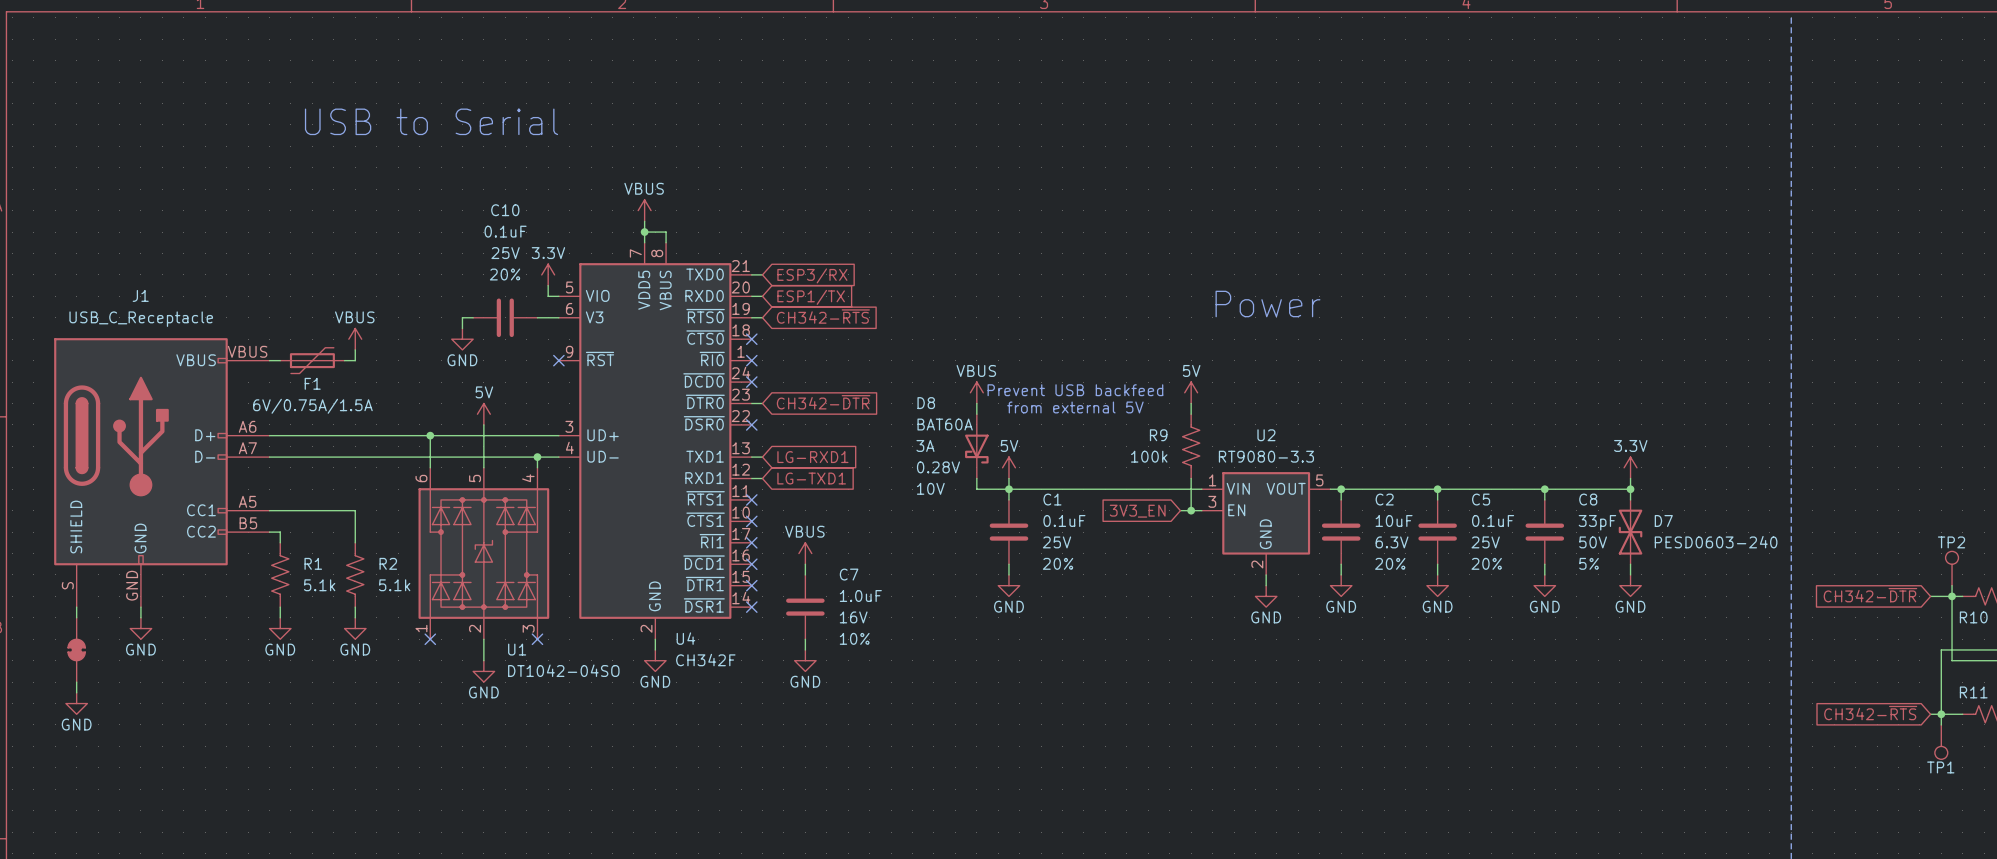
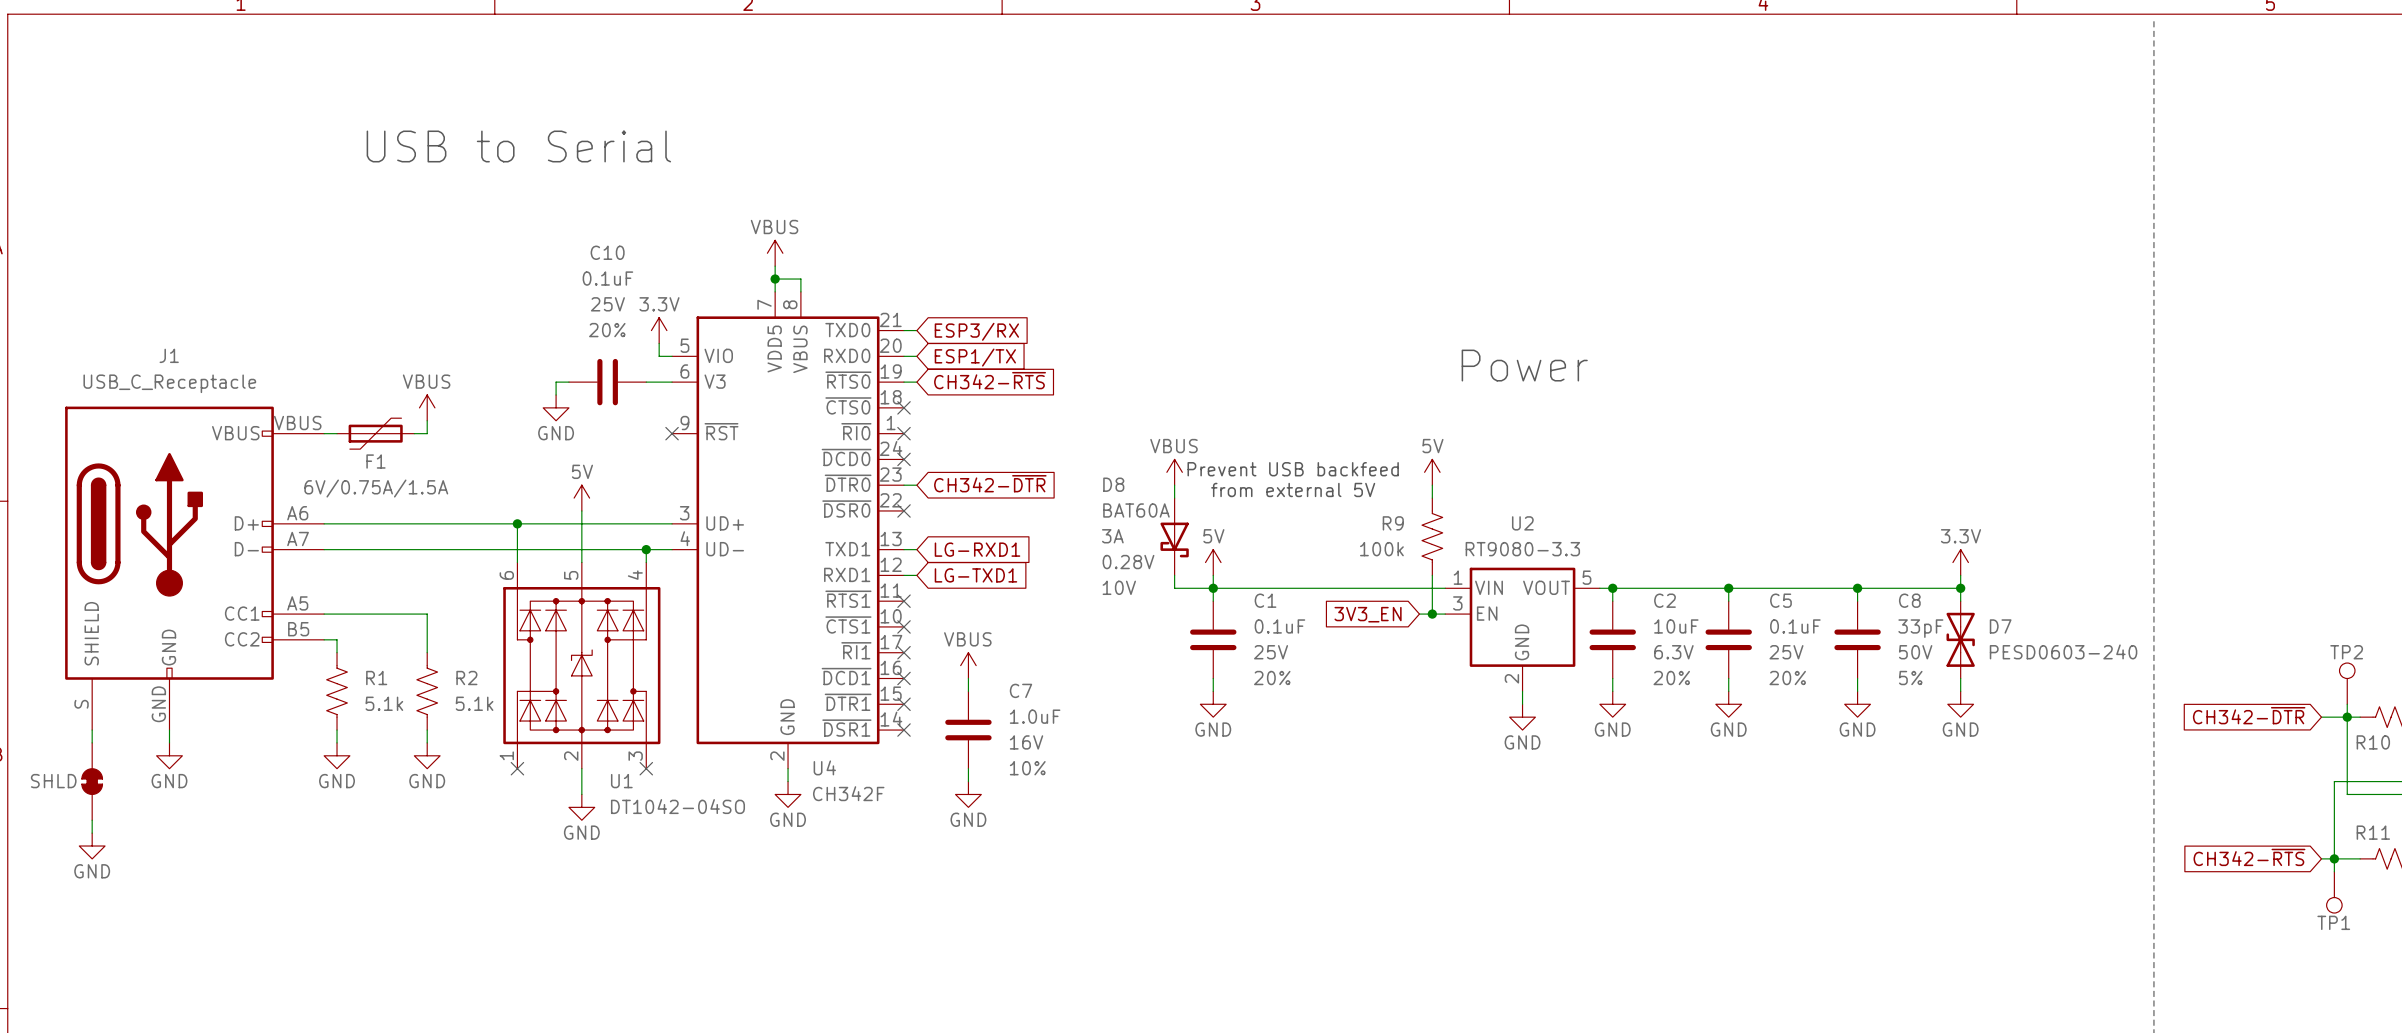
part value: none -> SHLD (53, 781)

